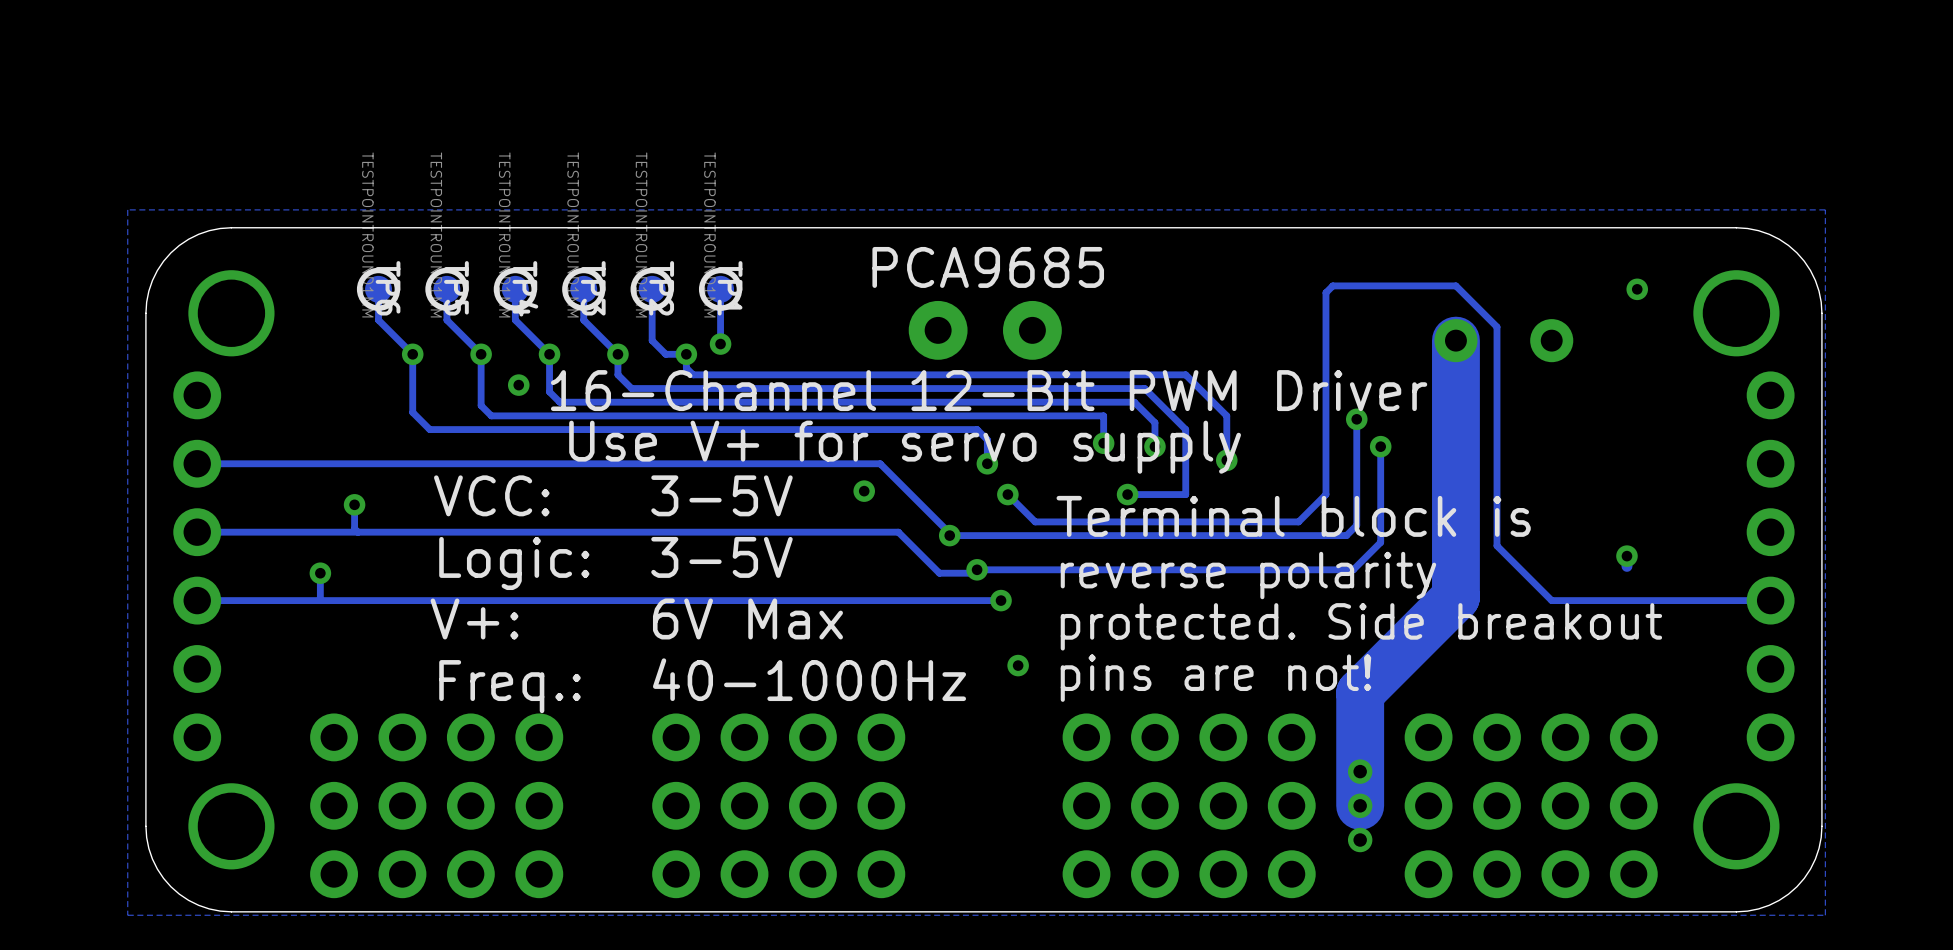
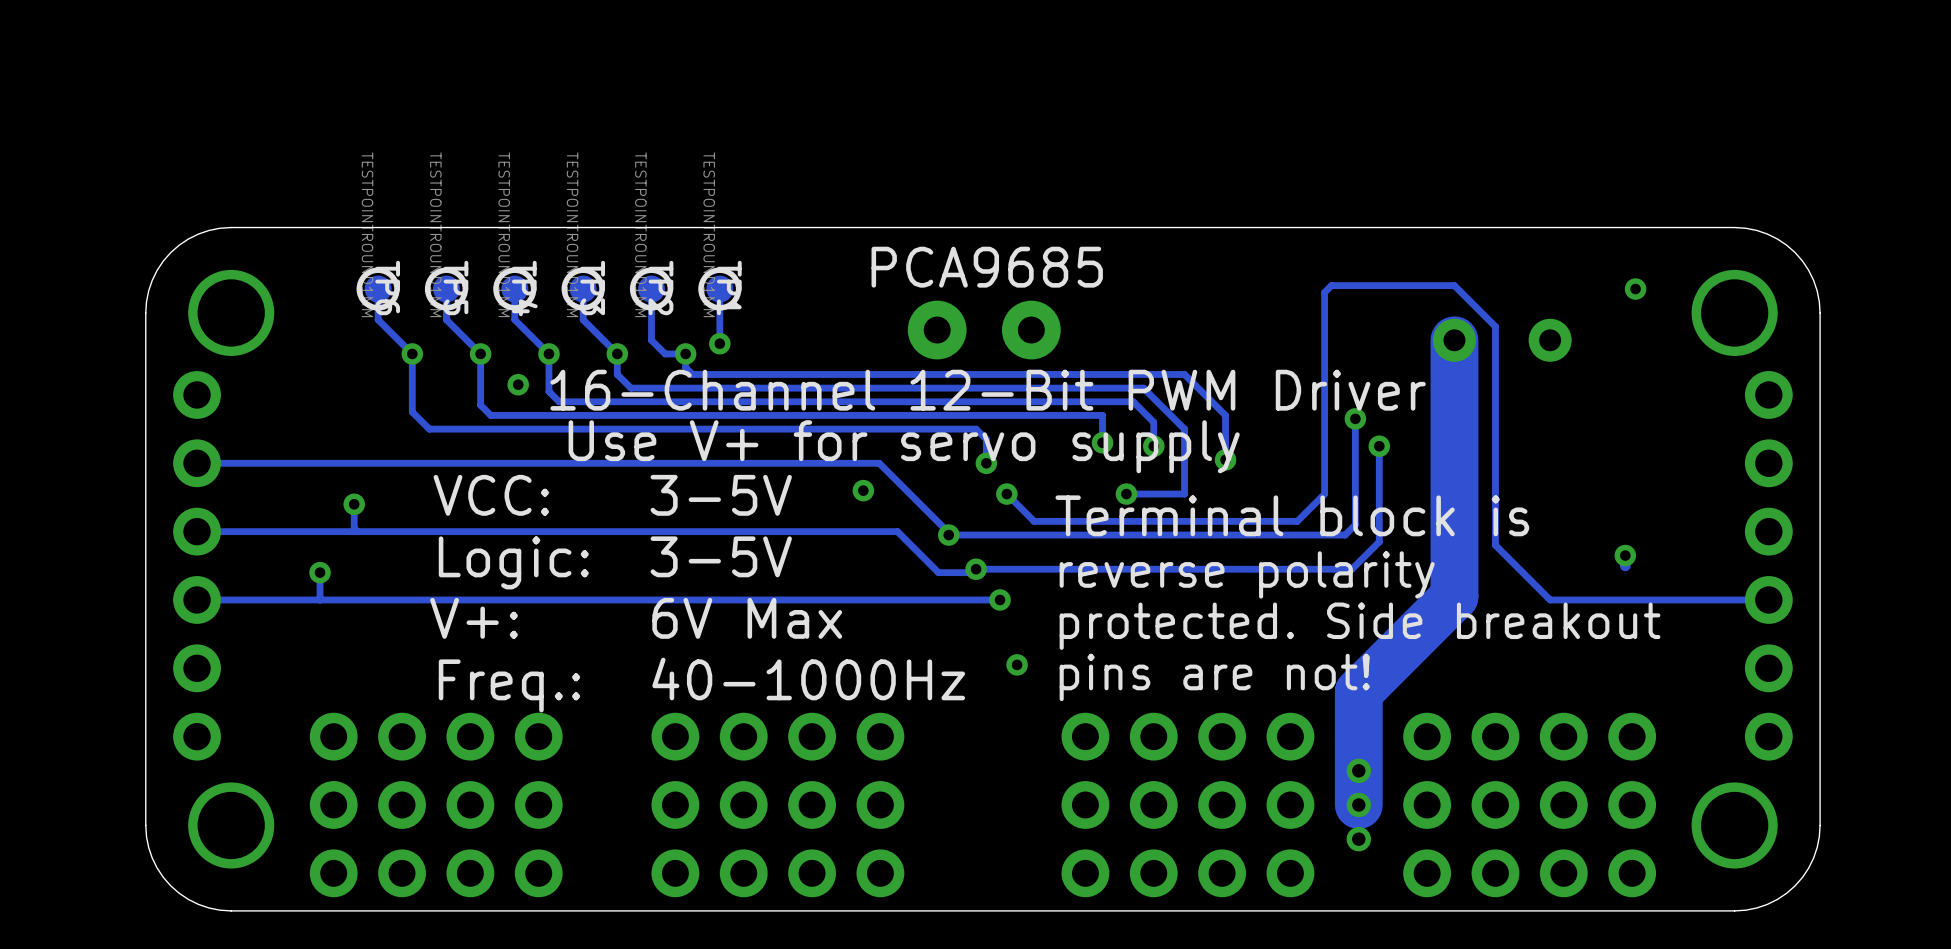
zone outline: (1825, 209) (1825, 915) (127, 915) (127, 209) (1825, 209) -> none

